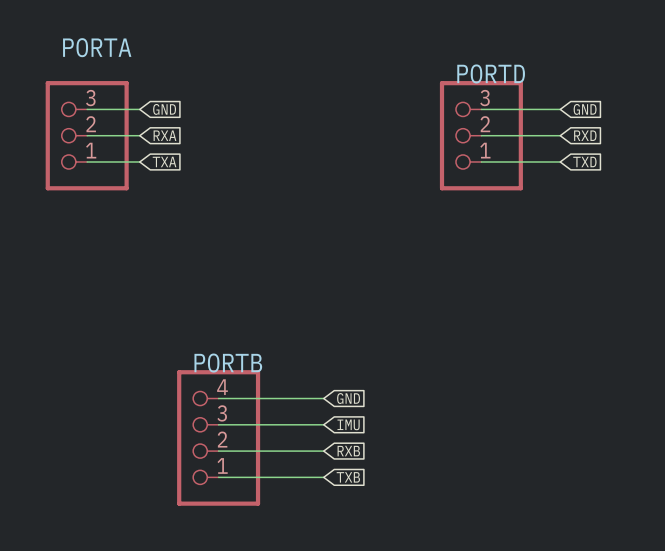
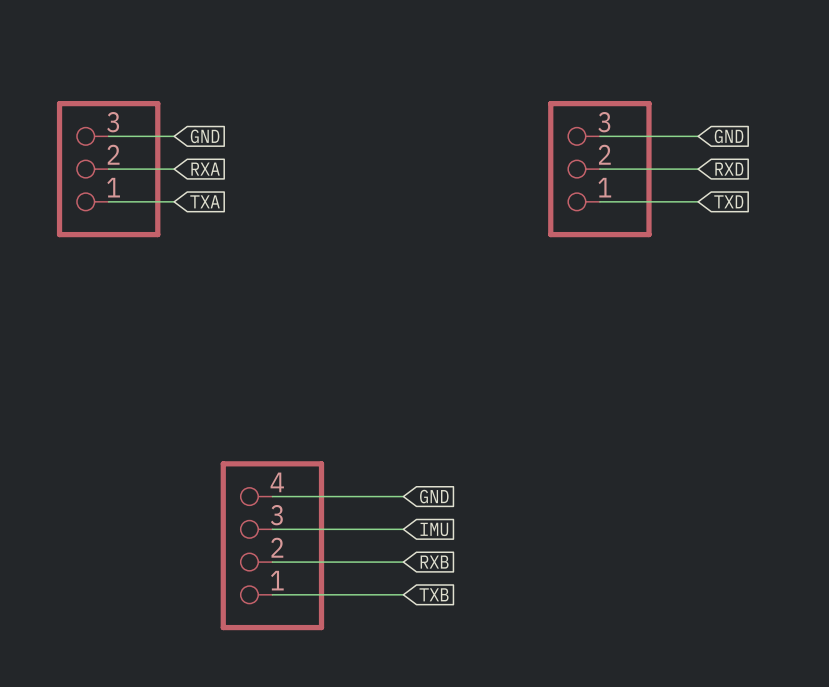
text: PORTA (97, 47) -> none
text: PORTD (491, 73) -> none
text: PORTB (228, 363) -> none

